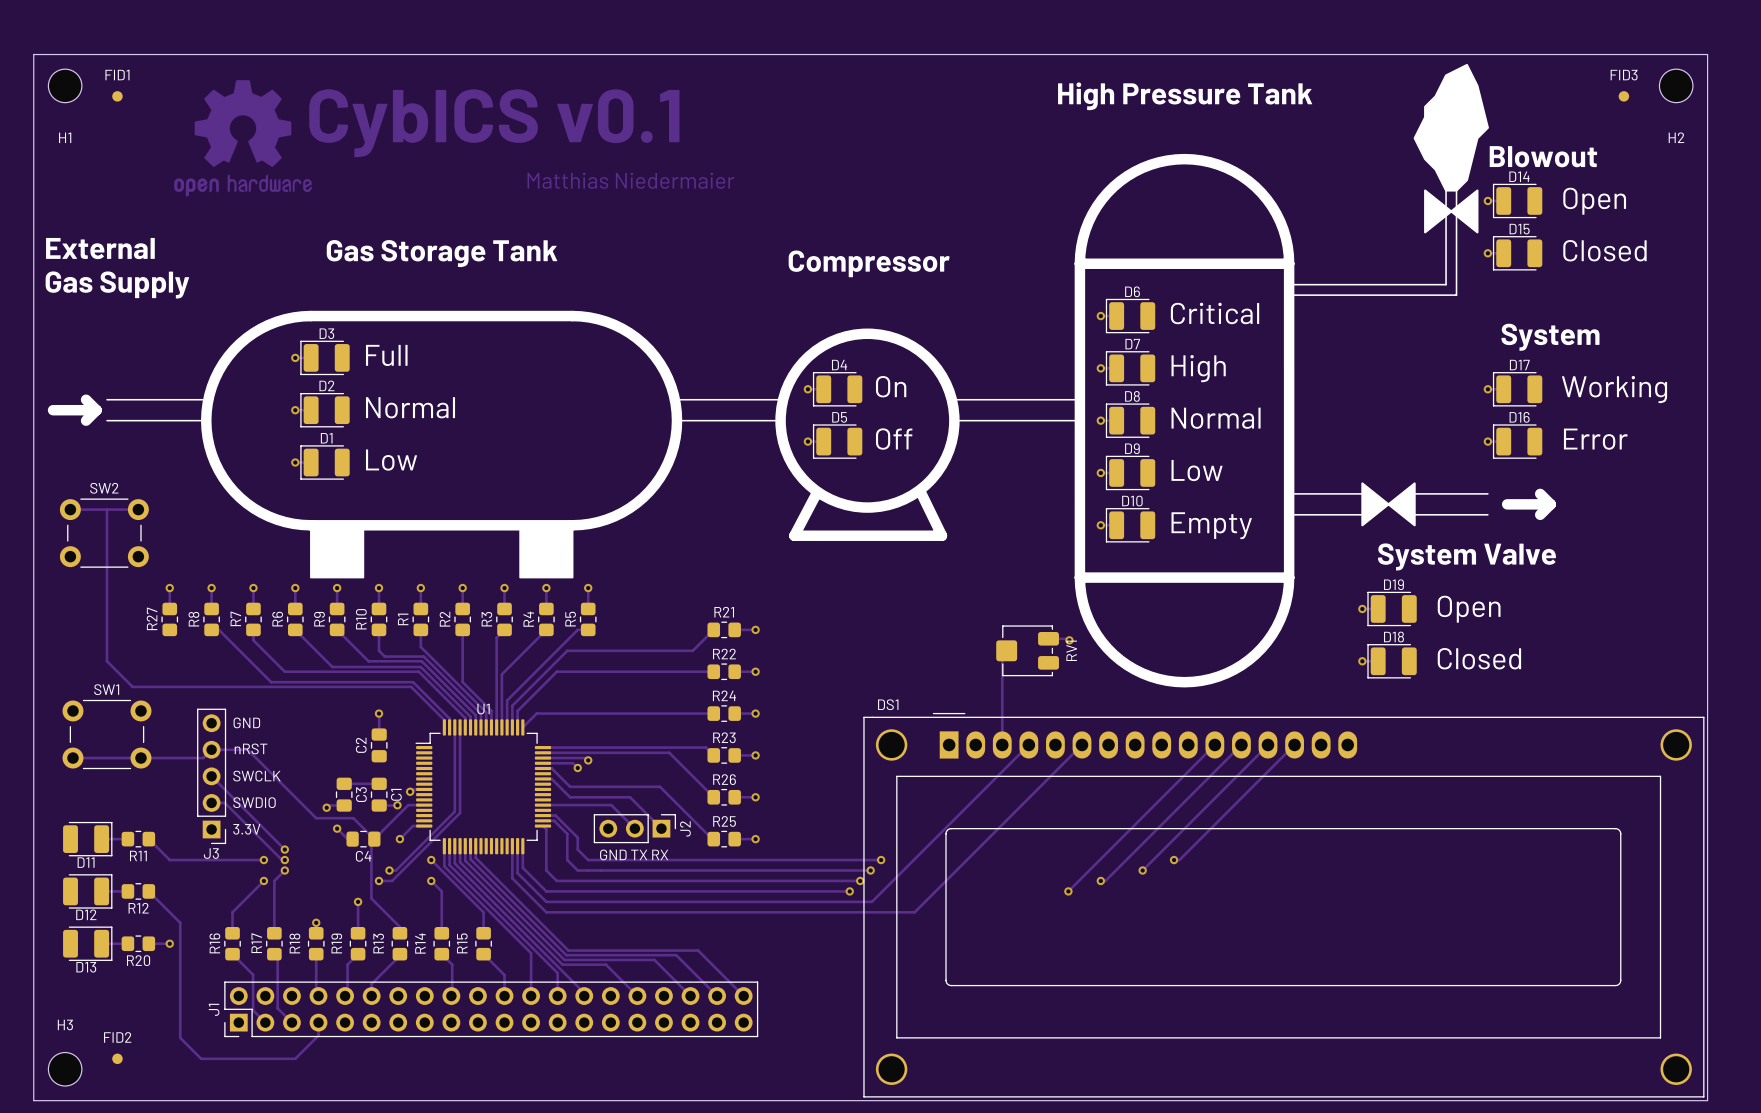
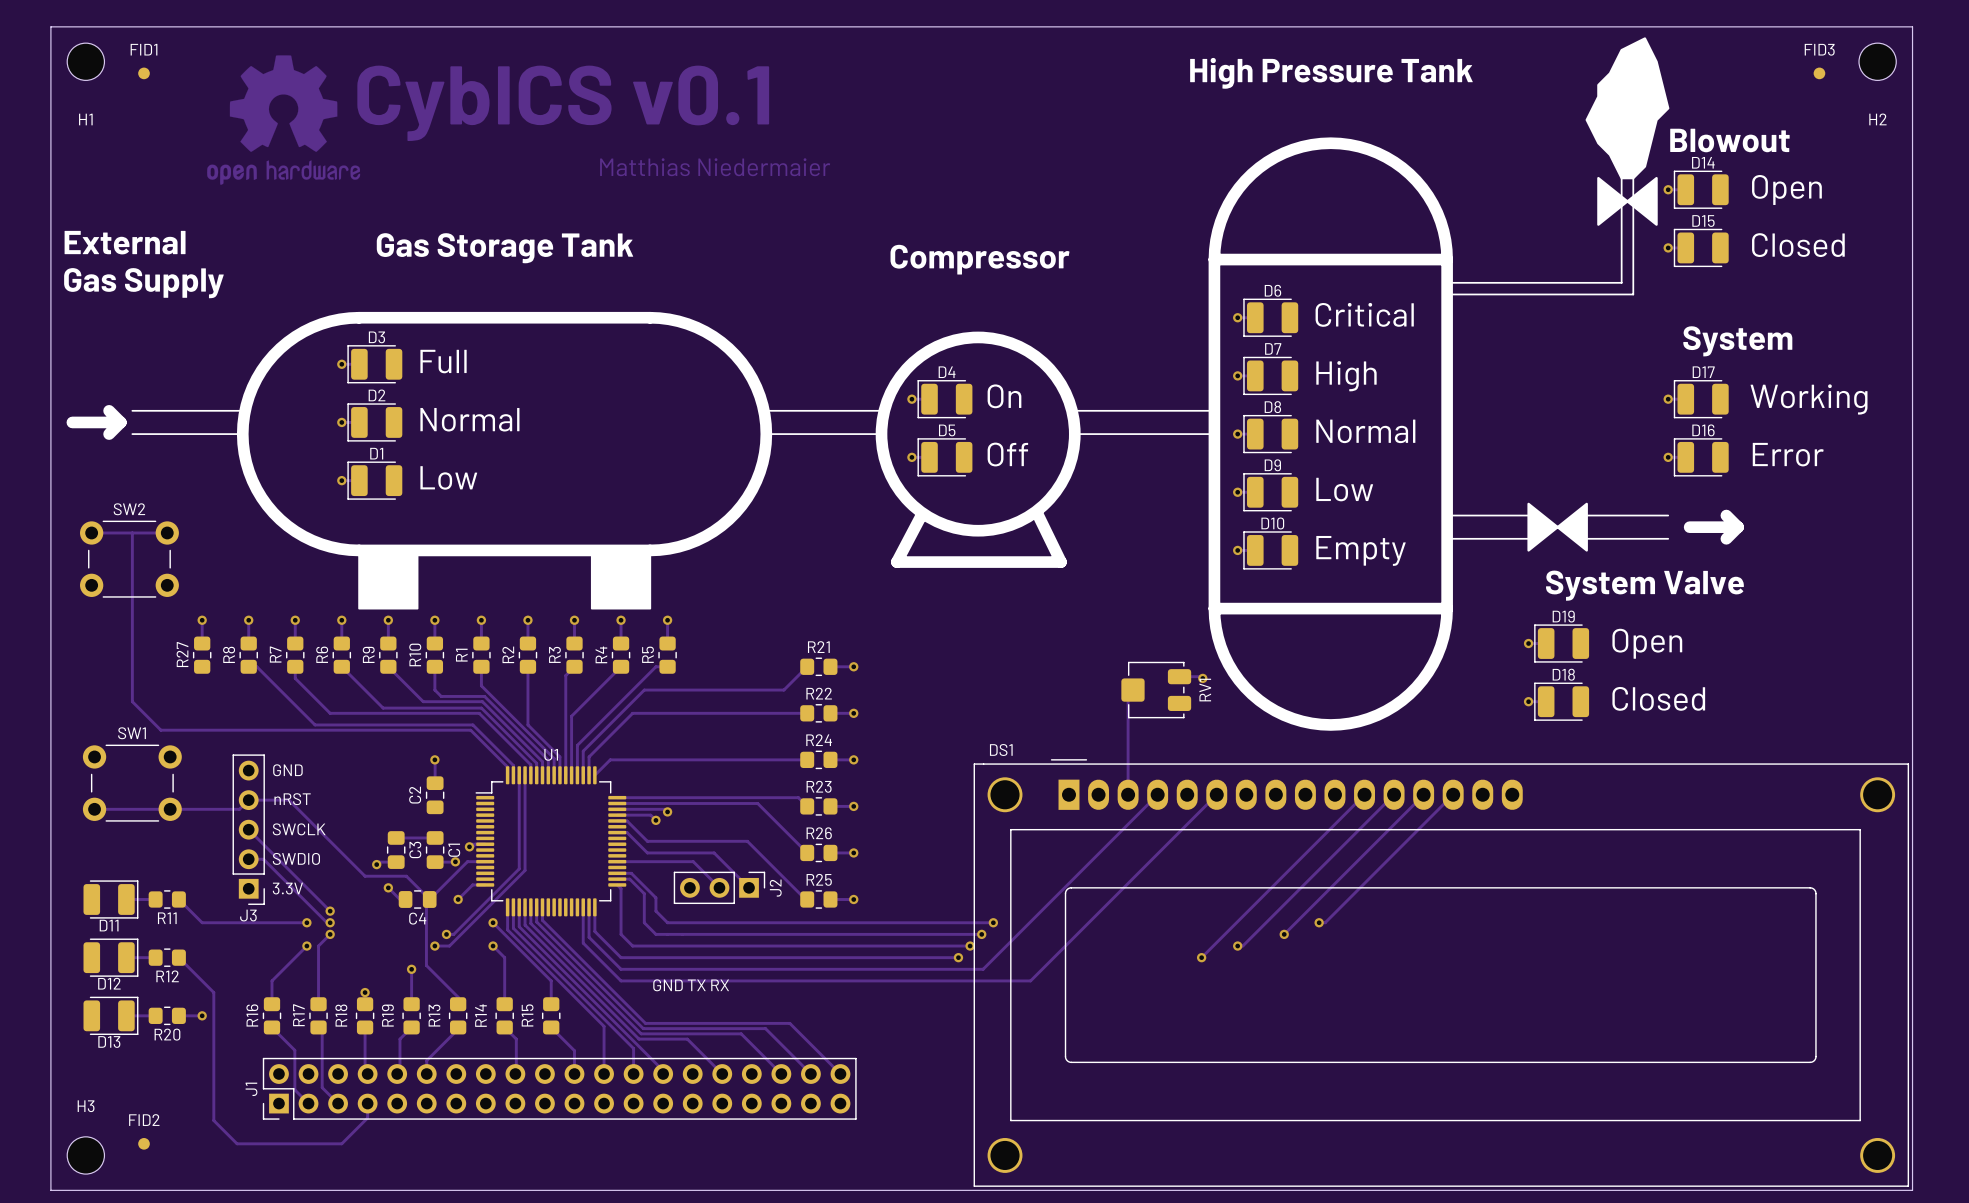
text position: GND TX RX (634, 854) -> GND TX RX (691, 985)

